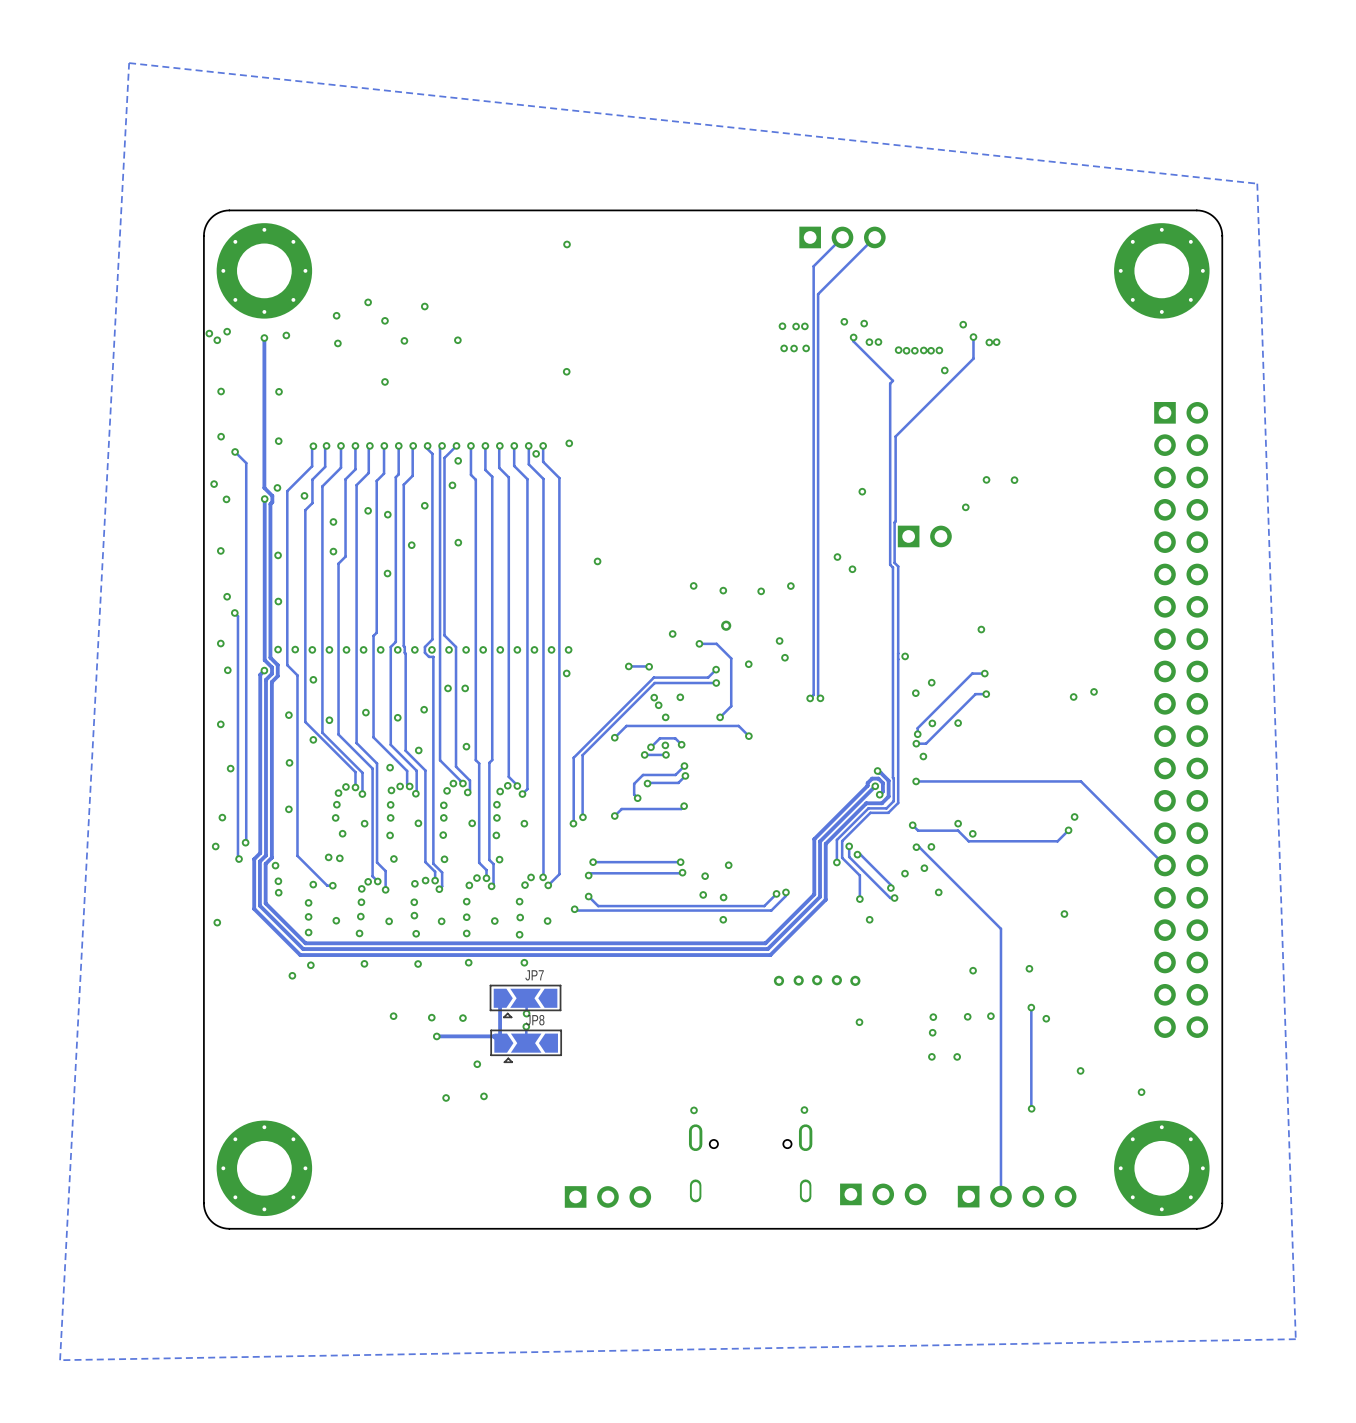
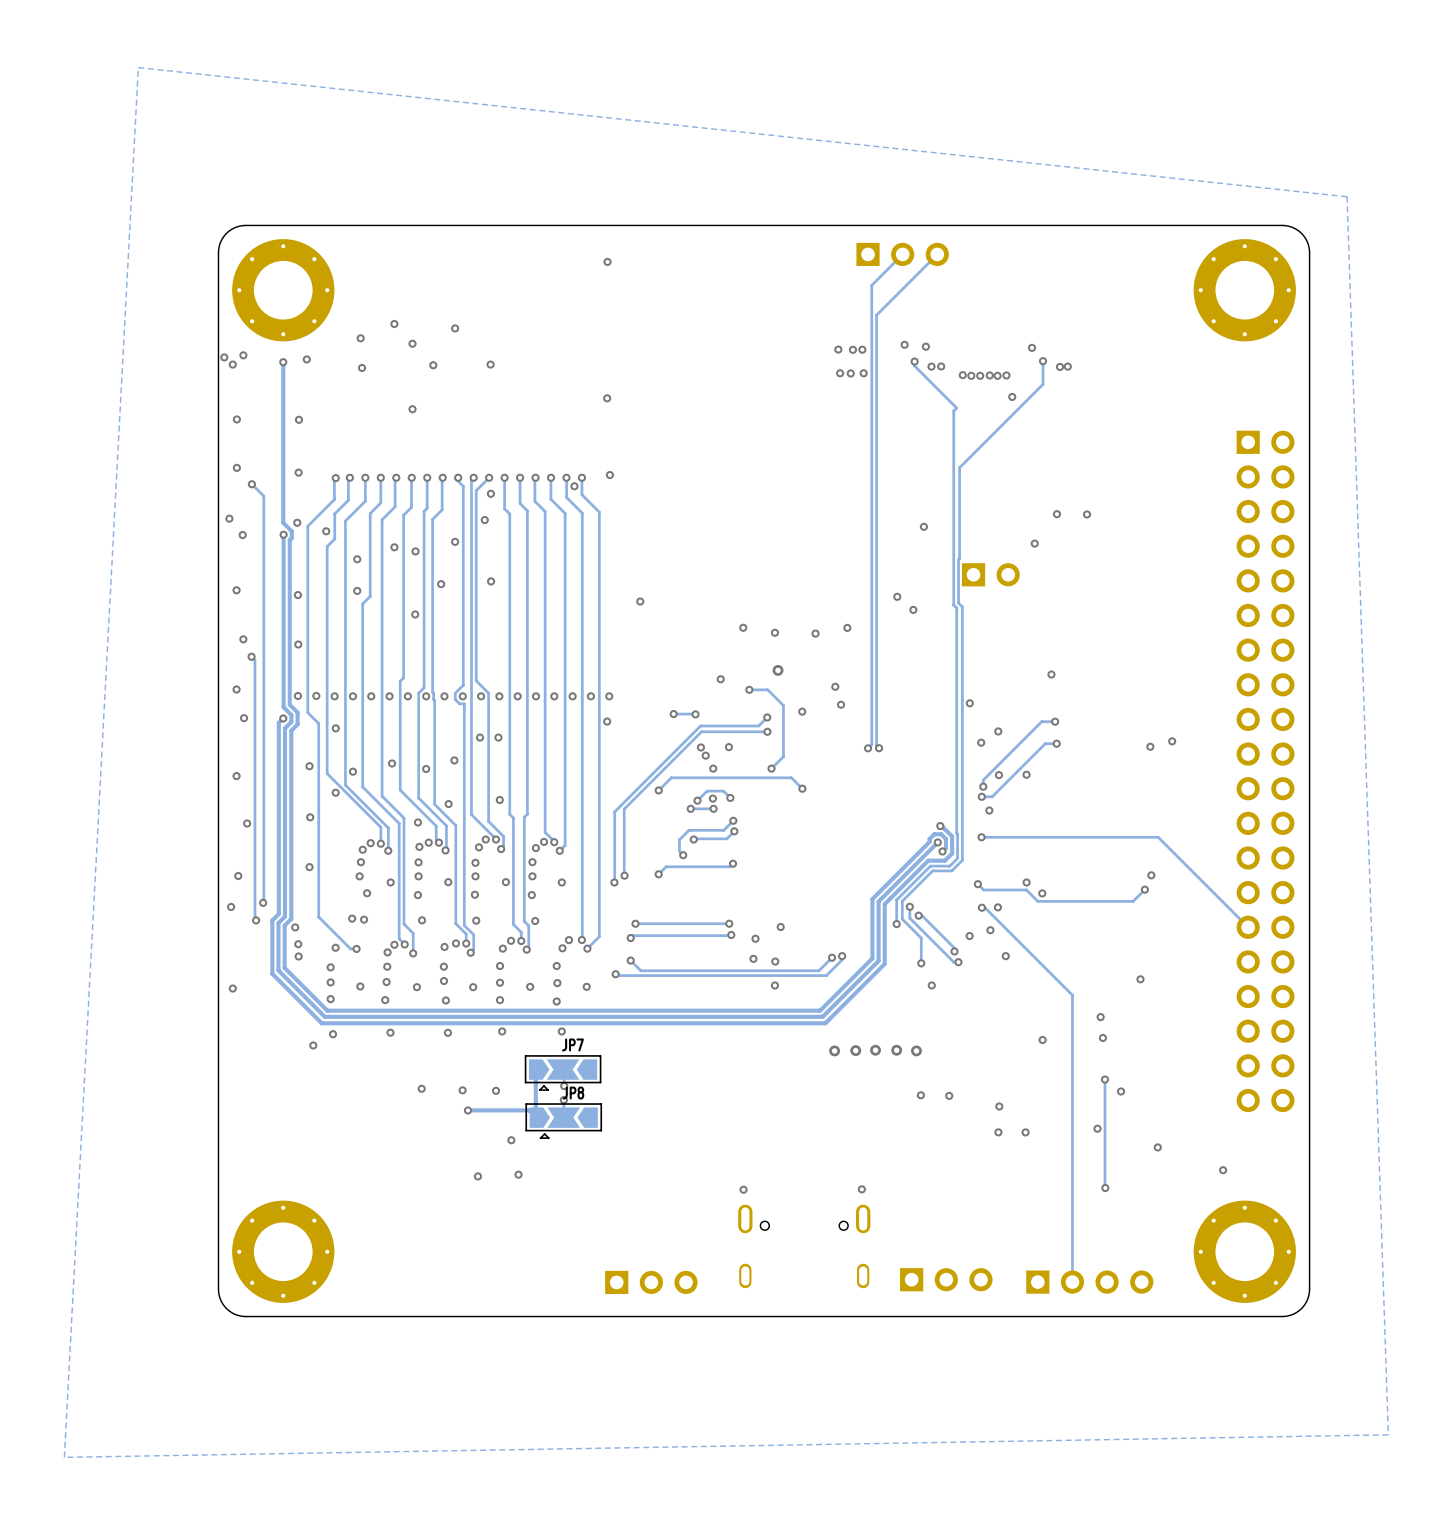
via: none -> (1100, 1017)
via: (967, 1016) -> none
via: (990, 1016) -> none
via: (933, 1017) -> none
via: none -> (949, 1095)
via: none -> (1097, 1128)

